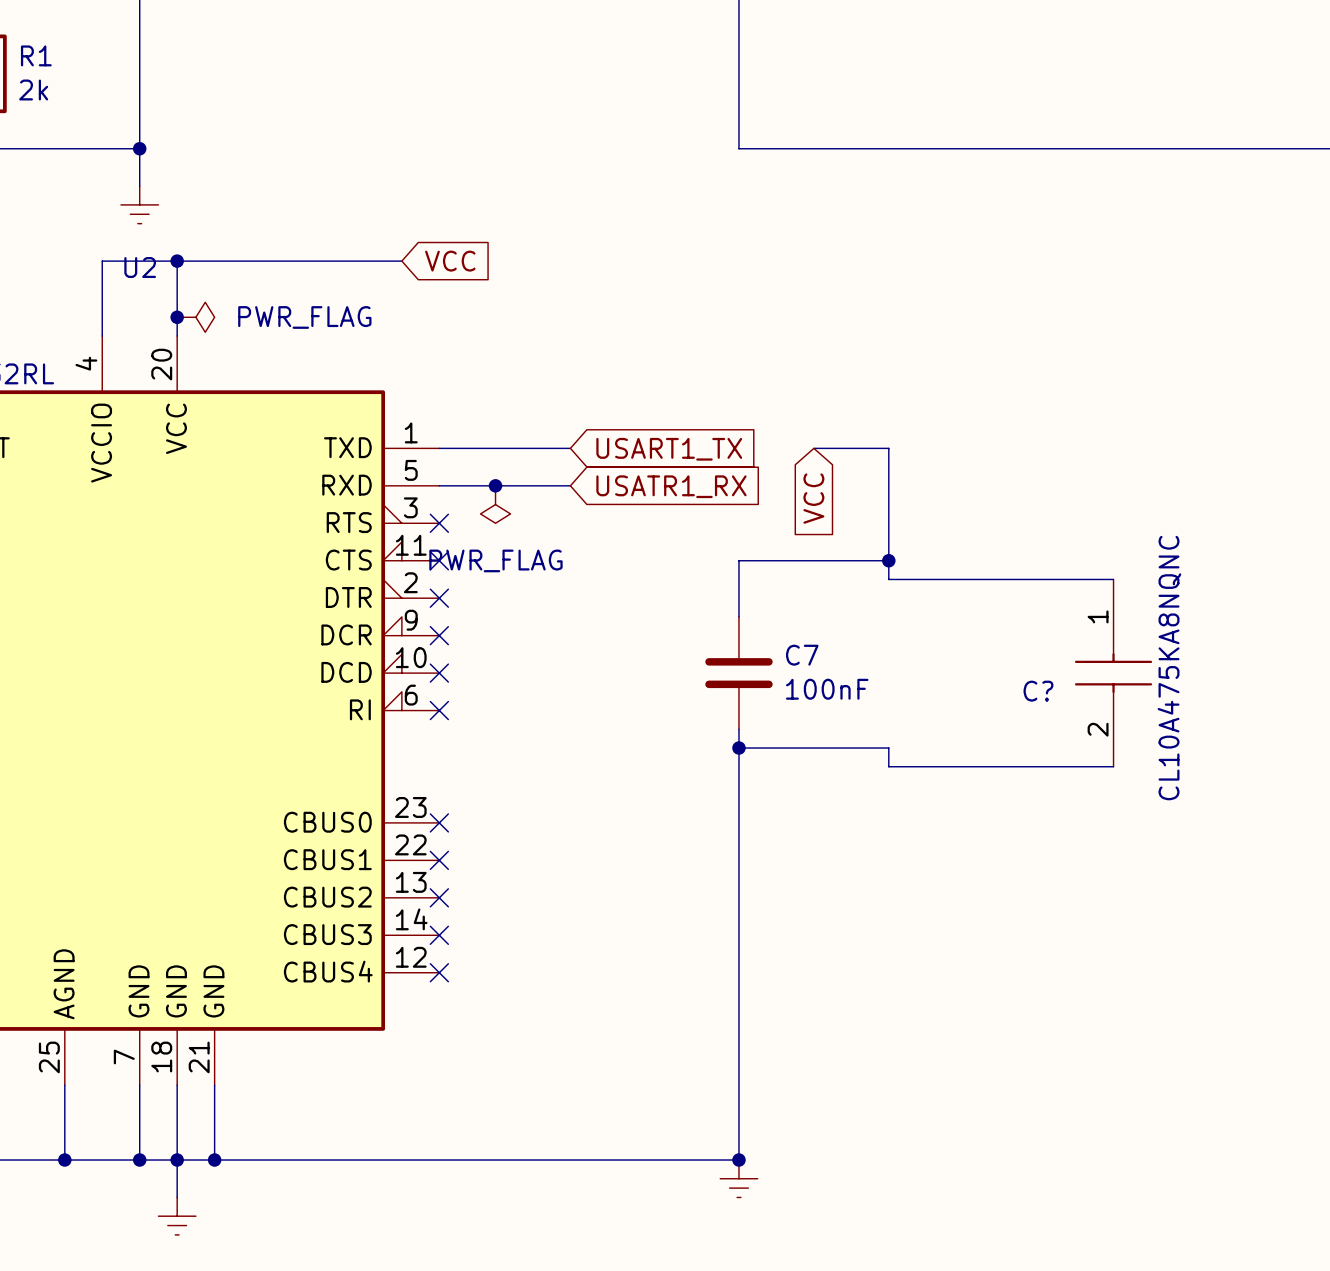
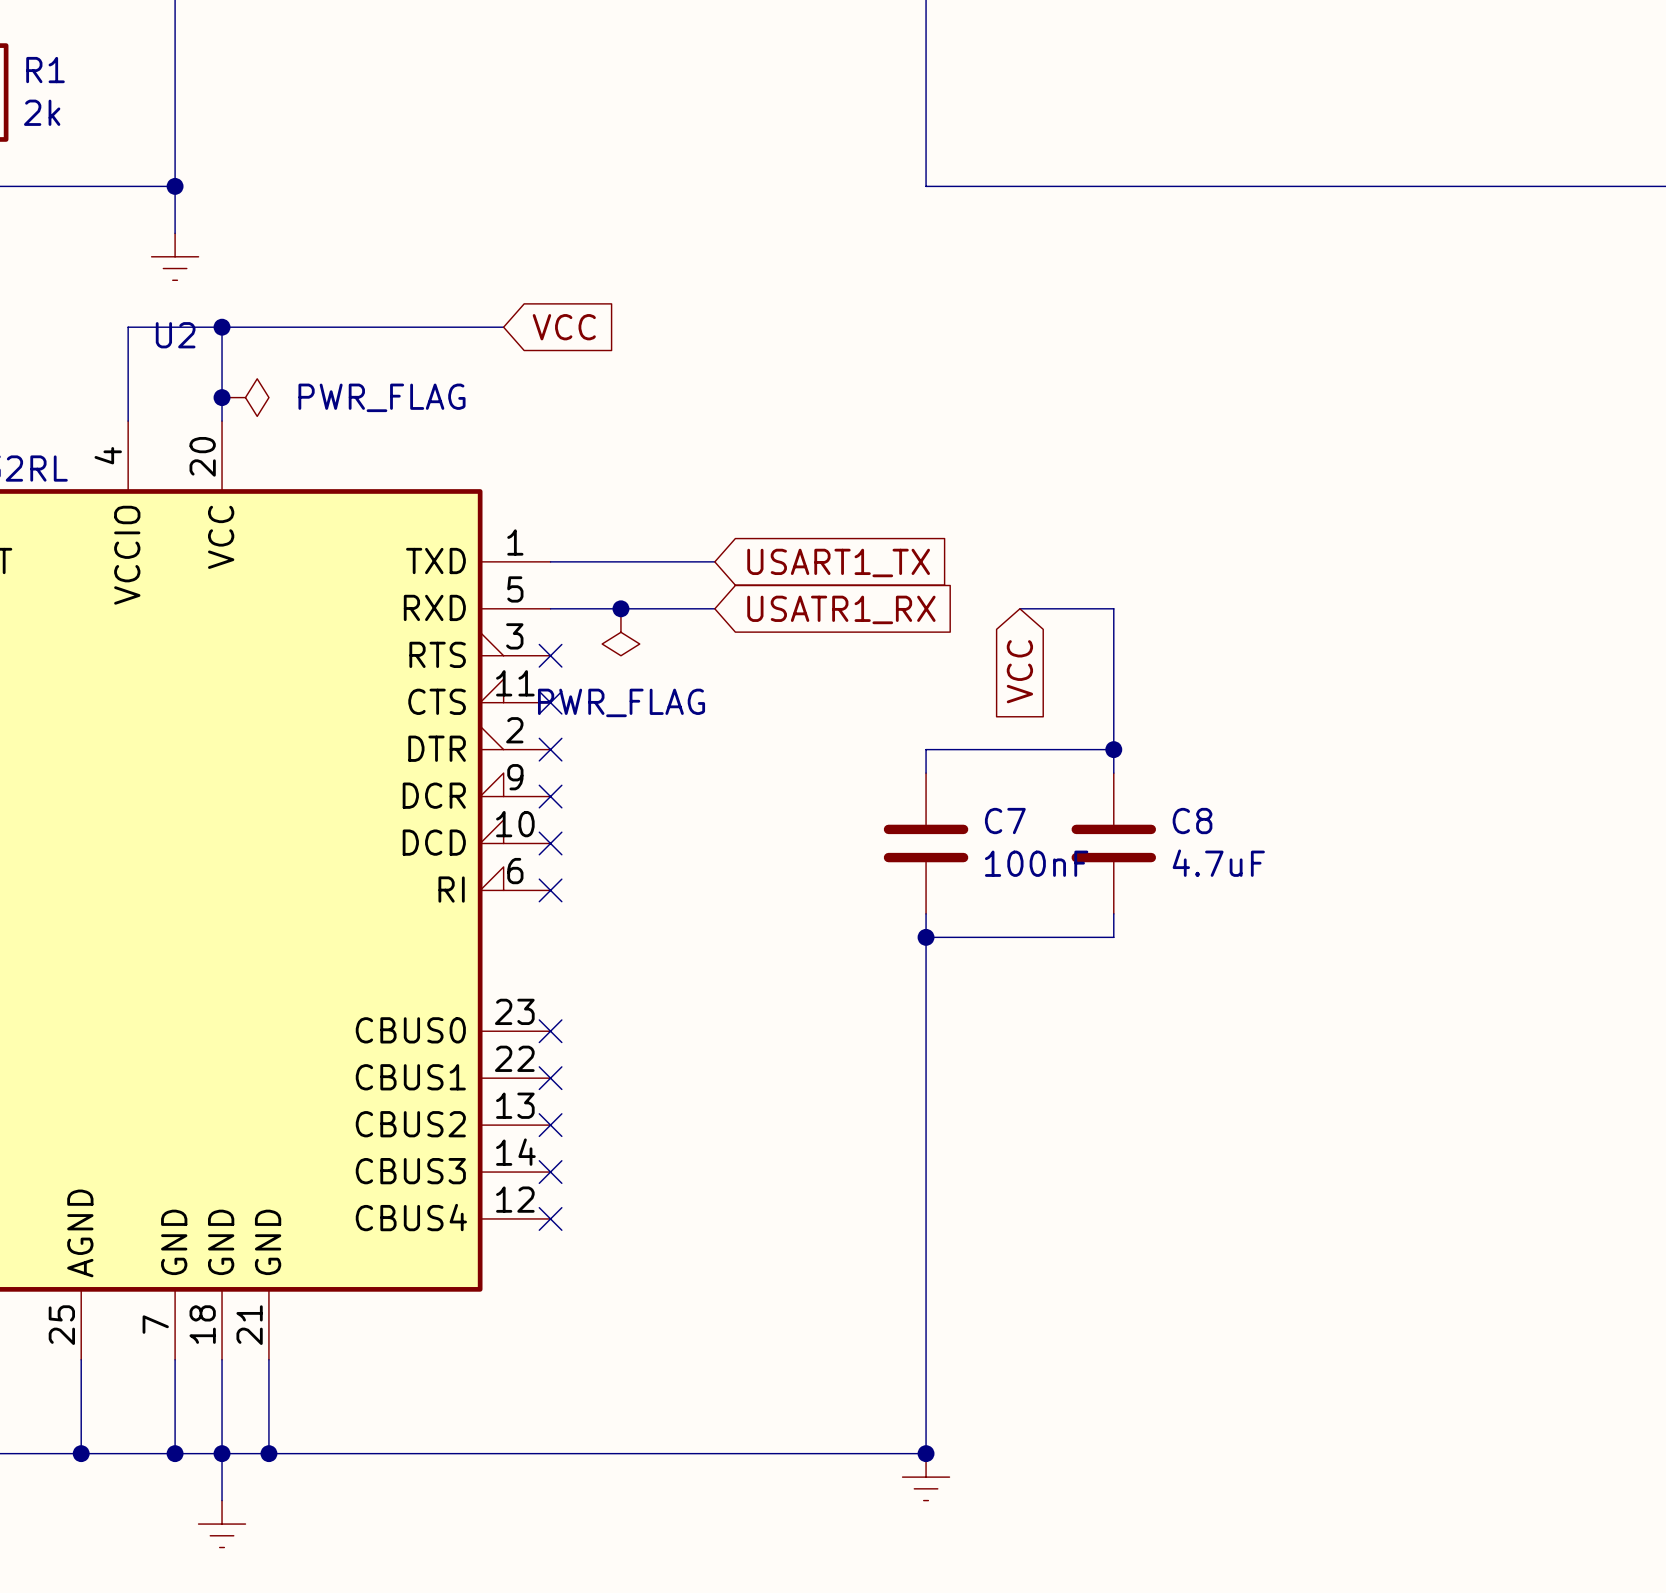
wire: (813, 448) (888, 448) (888, 485) -> (1019, 608) (1113, 608)
global label position: VCC (813, 498) -> VCC (1019, 671)
wire: (888, 560) (738, 560) (738, 598) -> (1113, 749) (926, 749)
junction position: (888, 560) -> (1113, 749)
wire: (888, 579) (1113, 579) -> (1113, 726) (1113, 773)
C8: none -> 4.7uF (1113, 843)
C?: CL10A475KA8NQNC (1113, 673) -> none
wire: (888, 748) (888, 766) (1113, 766) -> (1113, 937) (1113, 913)

